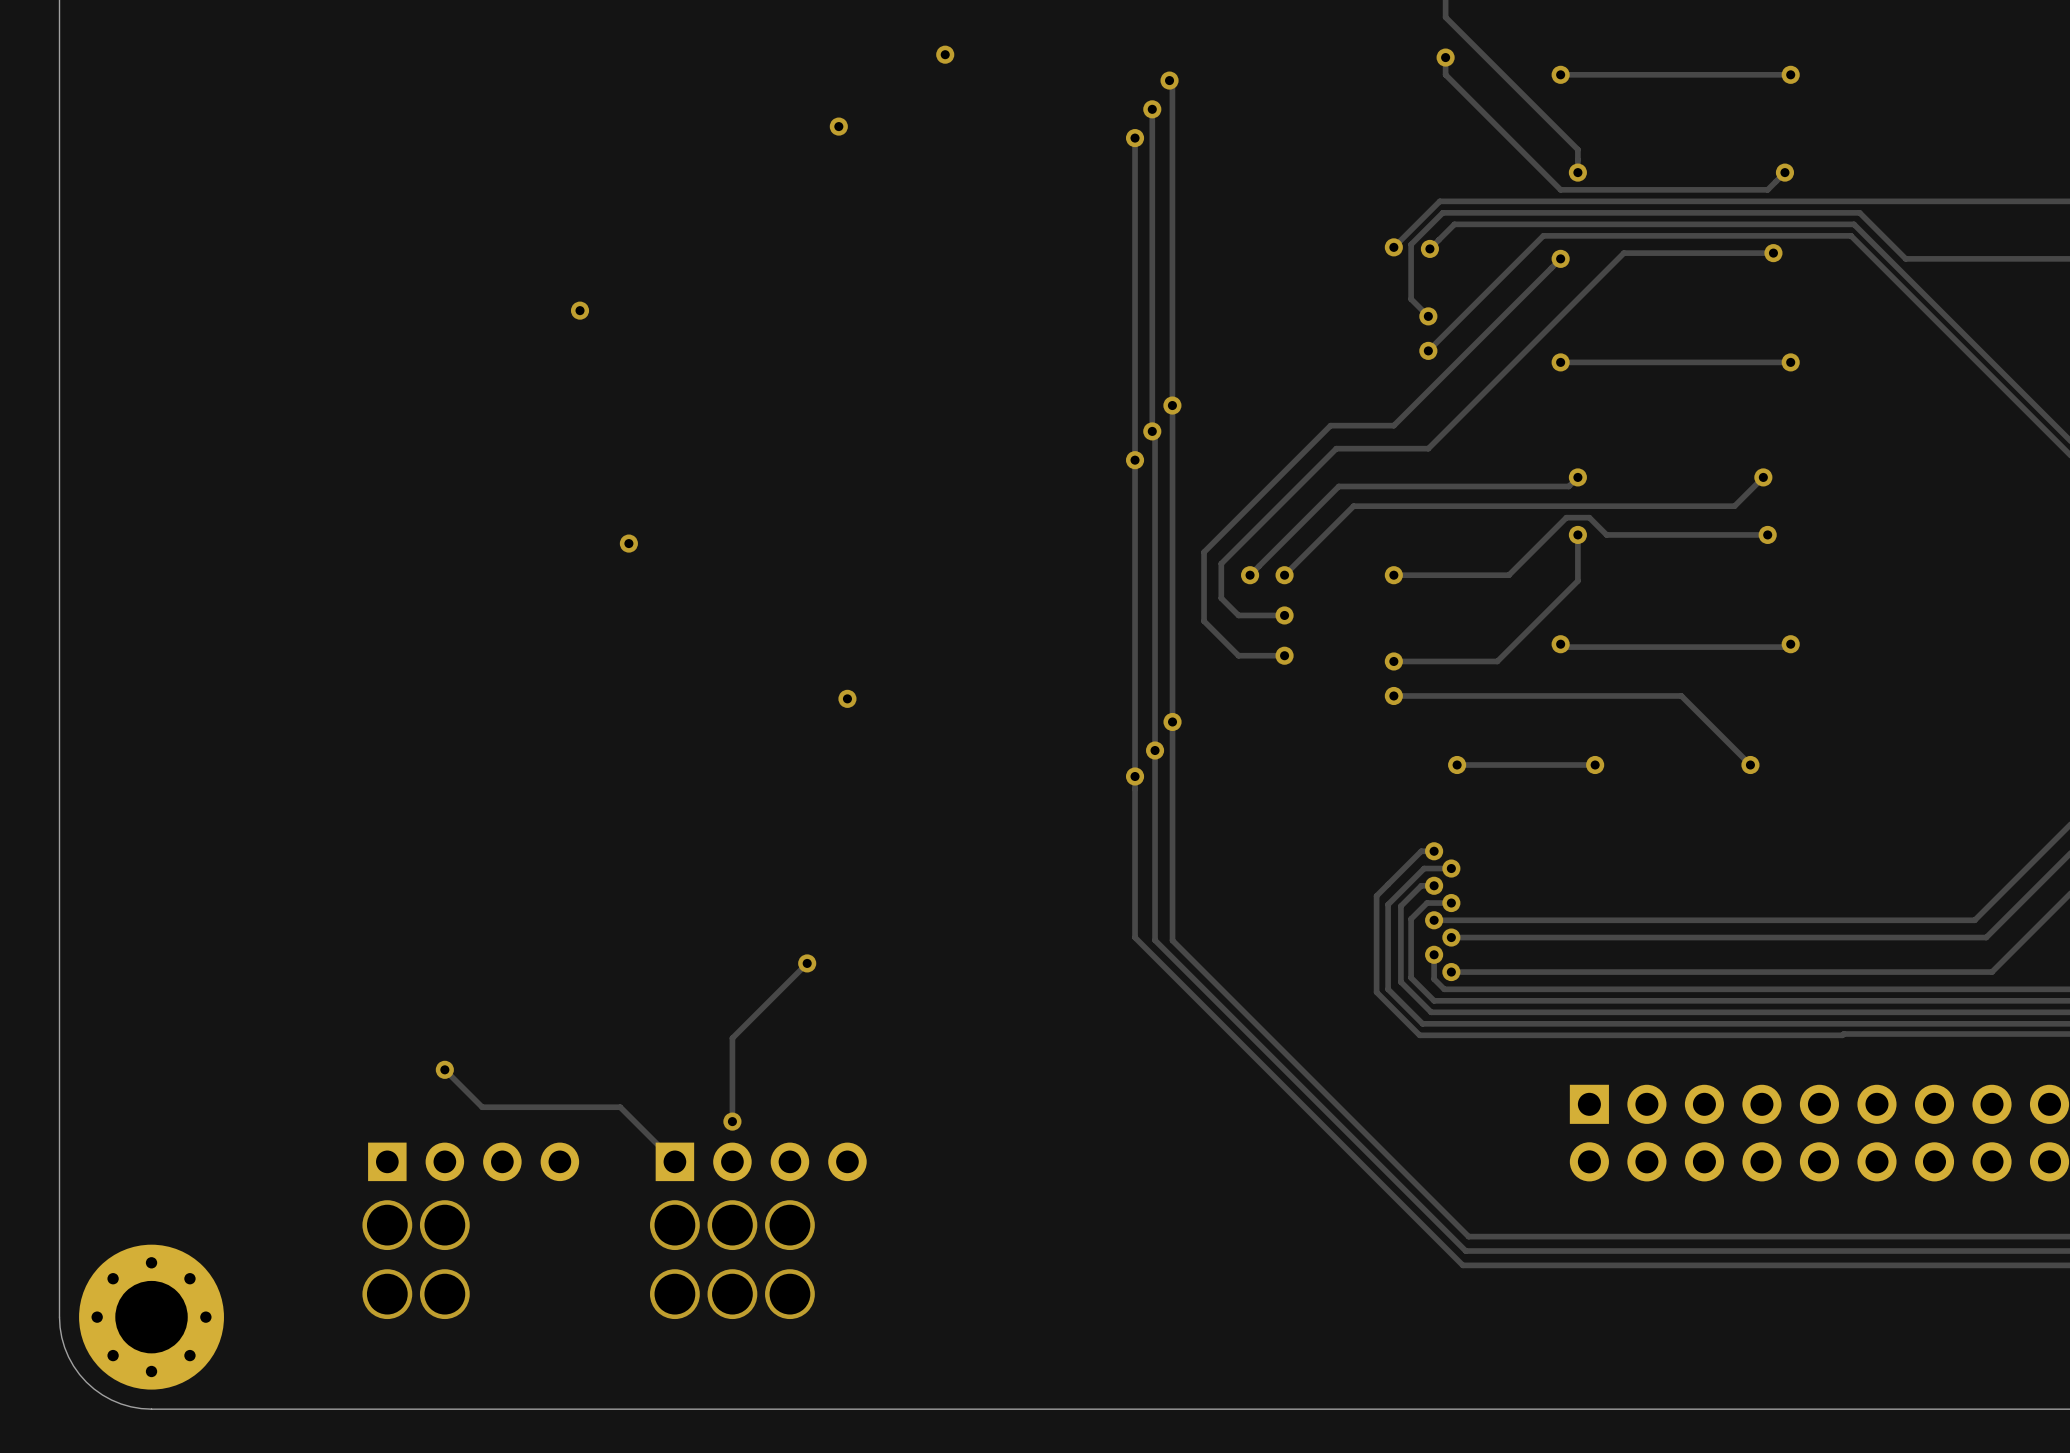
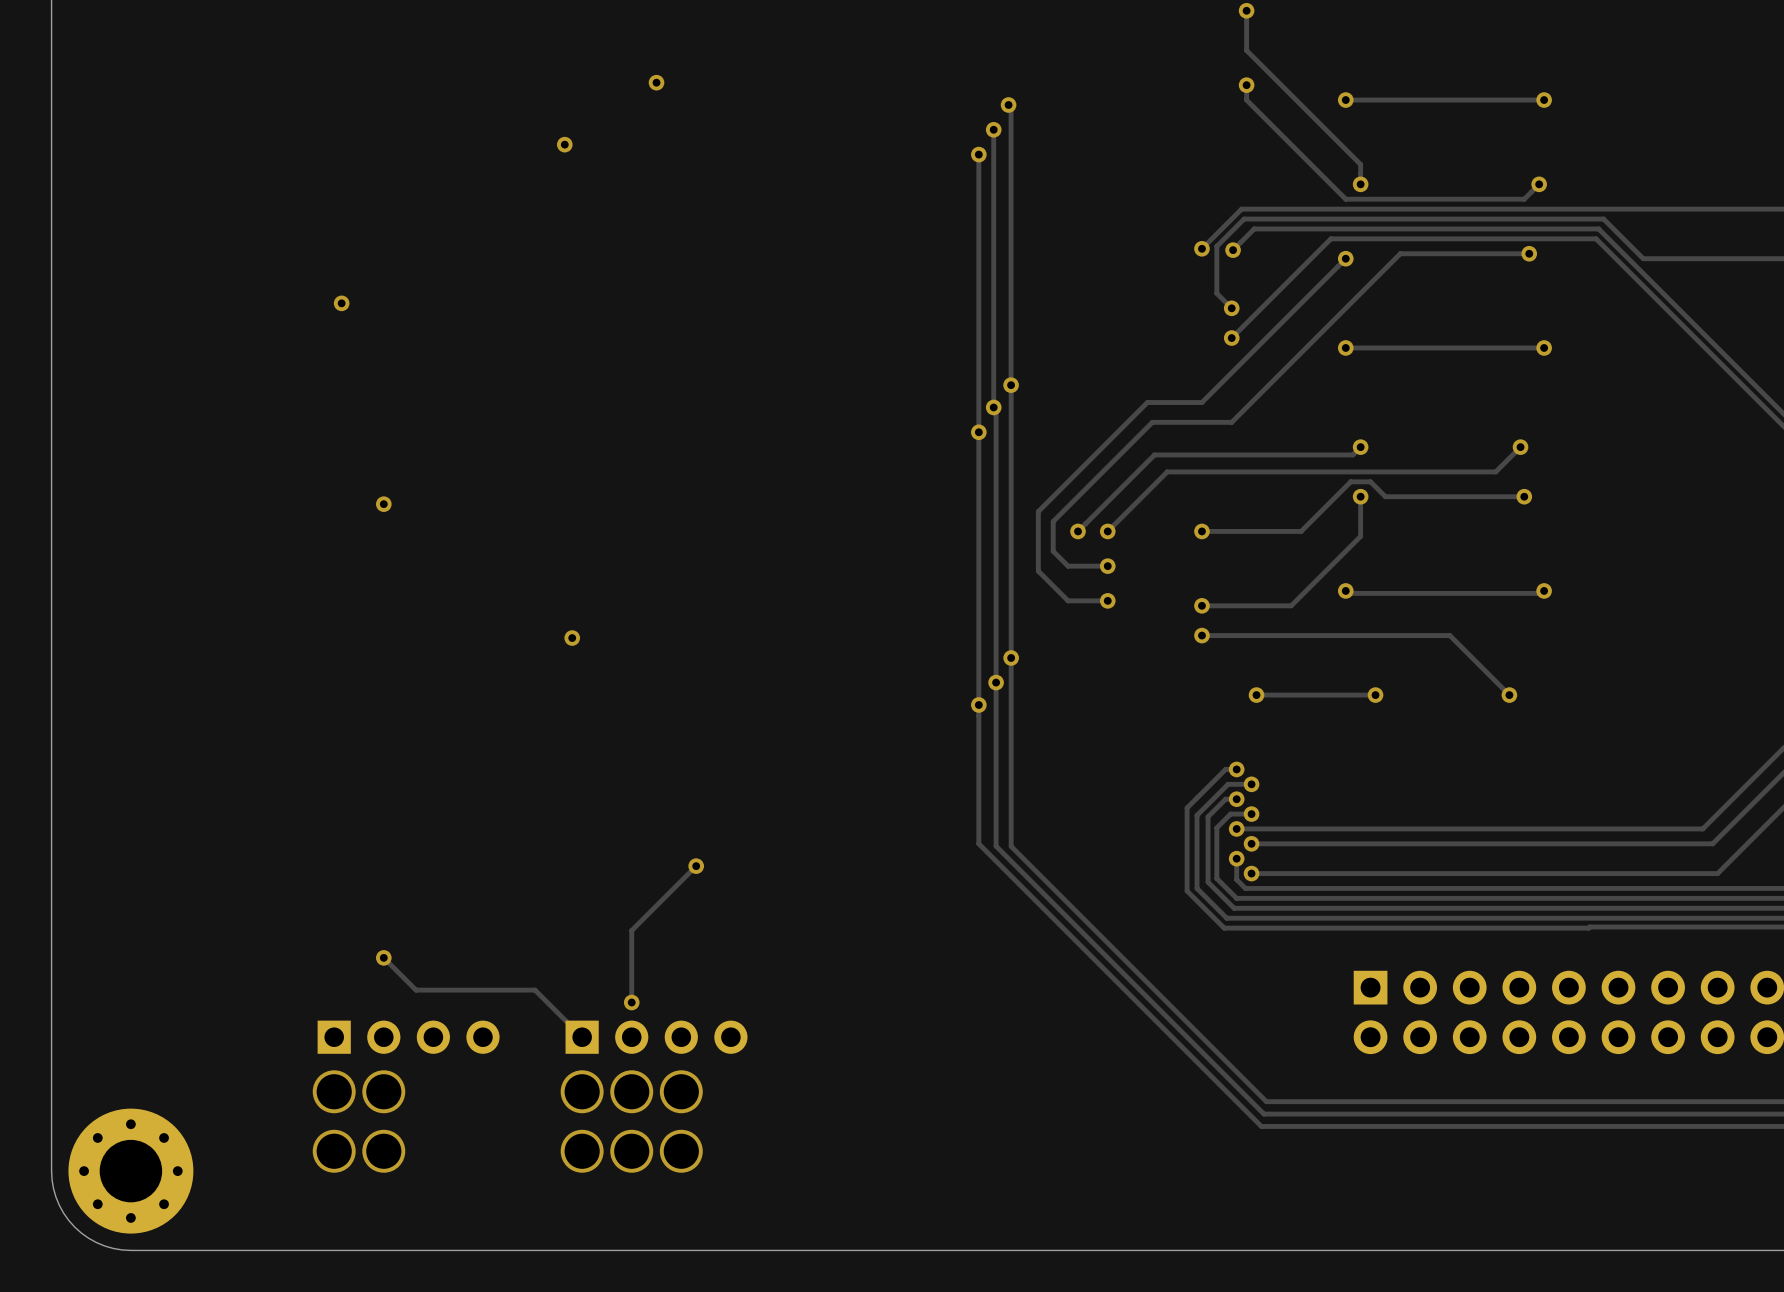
via: none -> (656, 82)
via: (945, 54) -> none
via: none -> (564, 144)
via: (838, 126) -> none
via: none -> (341, 303)
via: (580, 310) -> none
via: none -> (383, 504)
via: (628, 543) -> none
via: none -> (572, 638)
via: (847, 698) -> none

